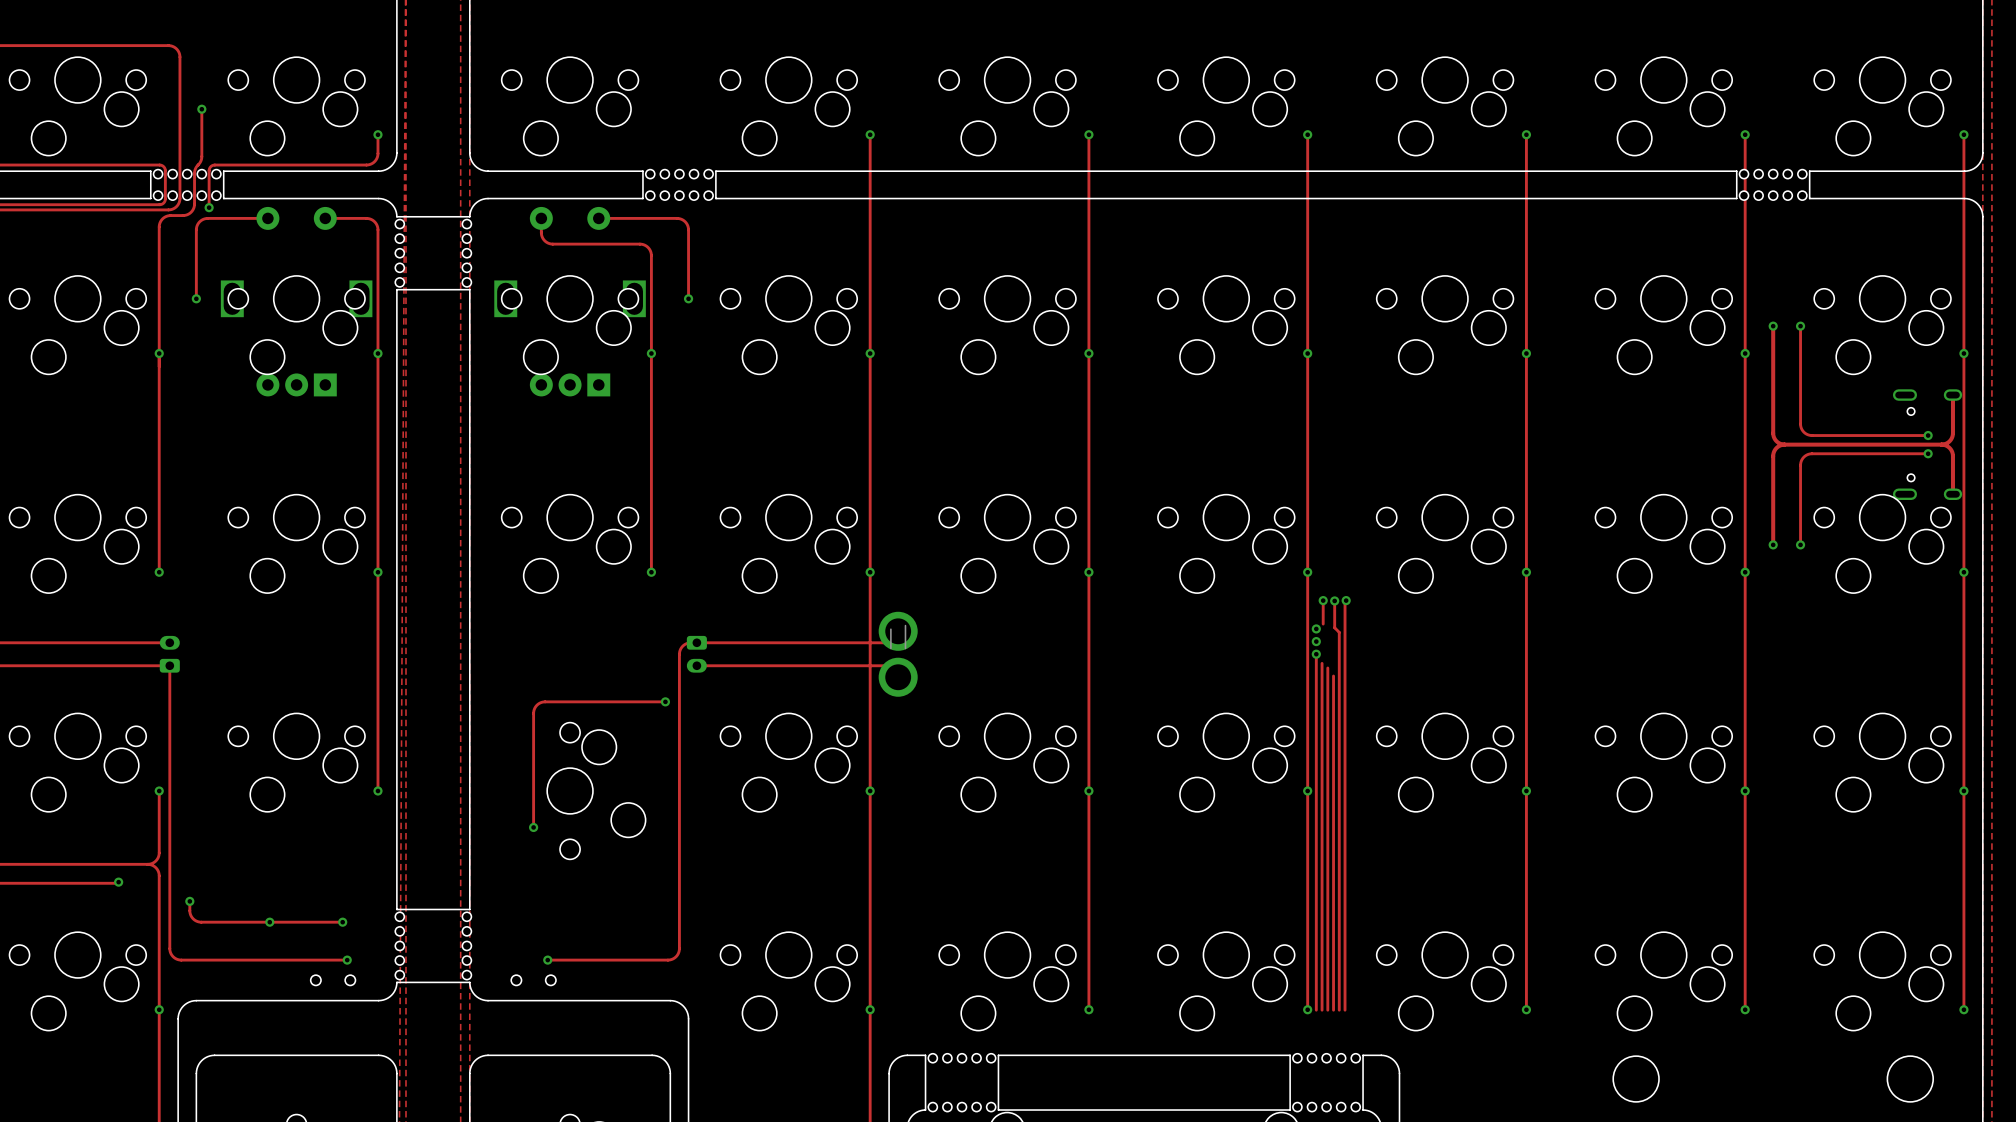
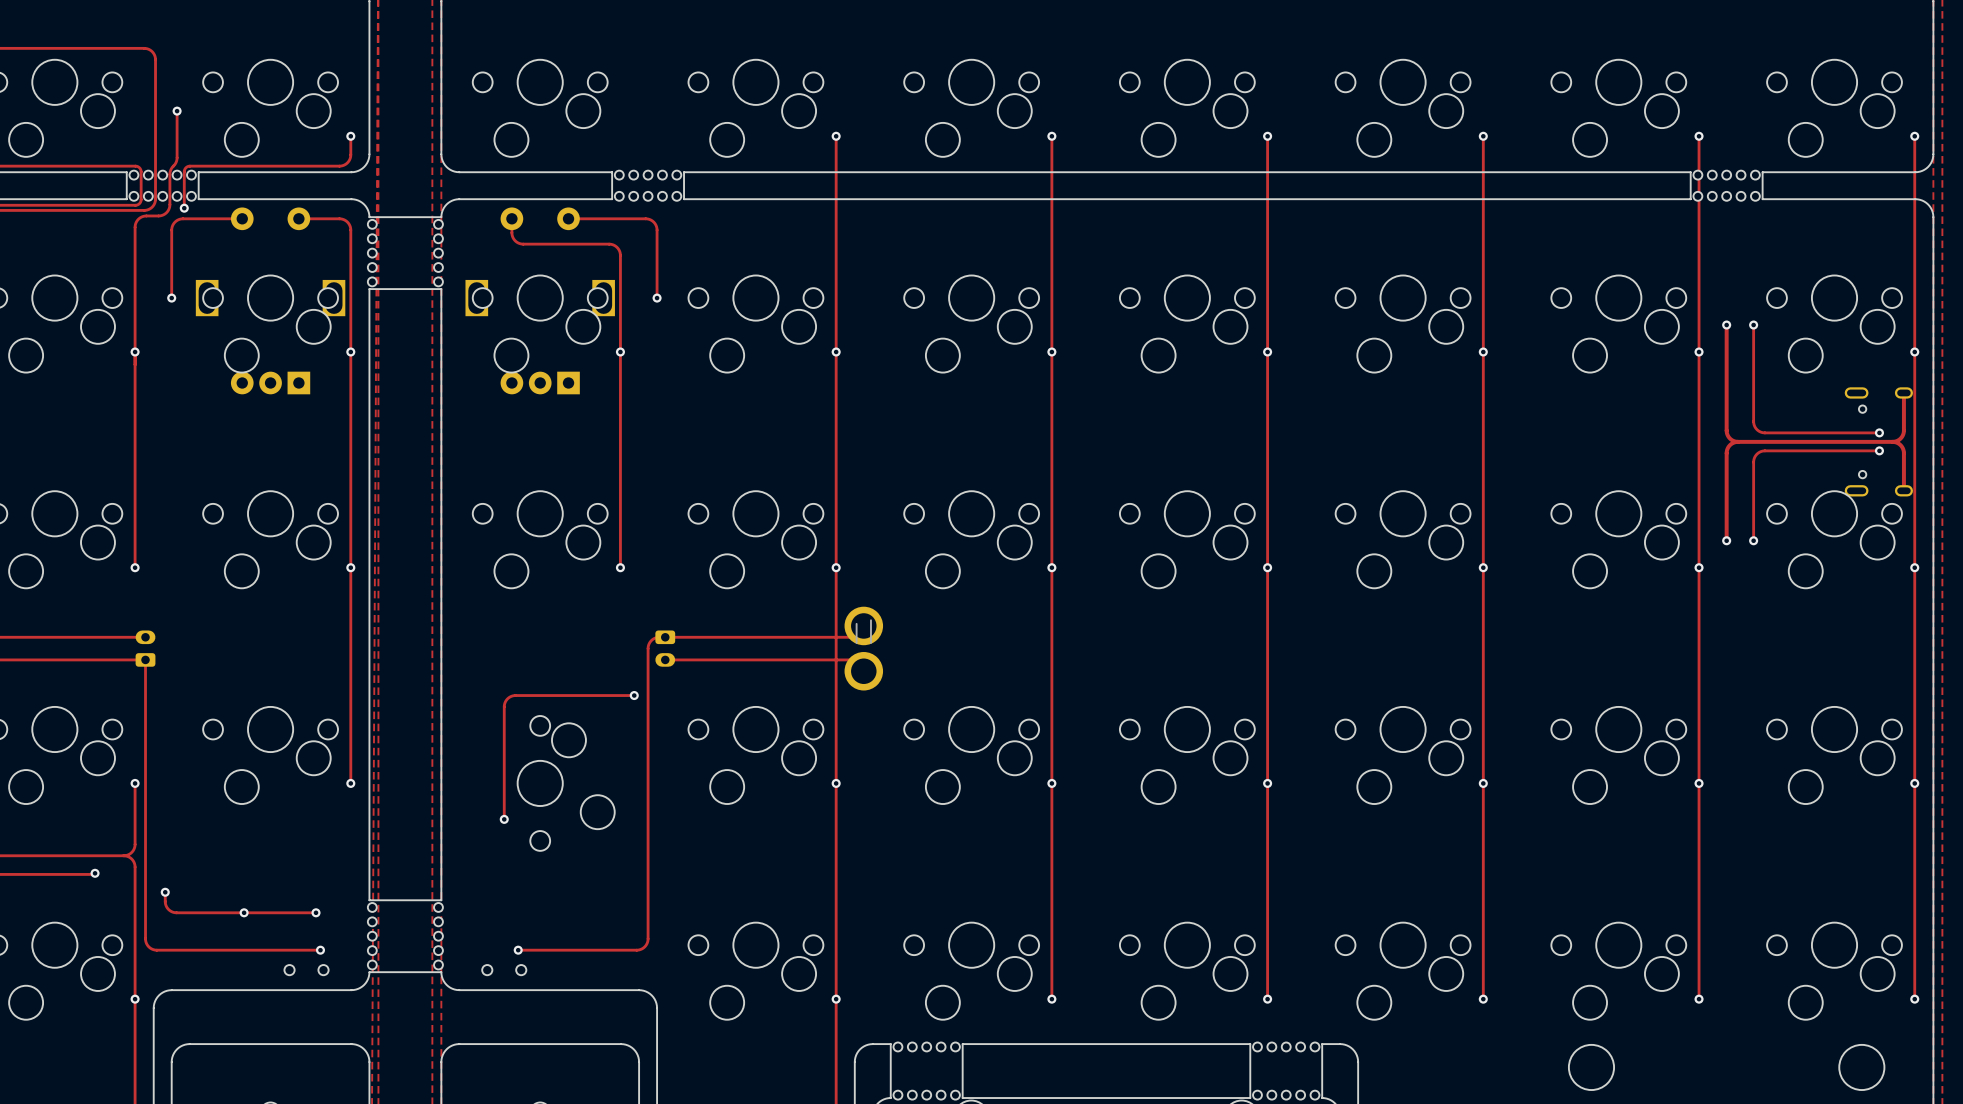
track: (1323, 600) (1323, 624) -> none
via: (1323, 600) -> none
track: (1334, 600) (1334, 627) (1339, 632) (1339, 1010) -> none
via: (1334, 600) -> none
track: (1346, 600) (1345, 1010) -> none
via: (1346, 600) -> none
via: (1316, 628) -> none
via: (1316, 641) -> none
track: (1316, 654) (1316, 1010) -> none
via: (1316, 654) -> none
track: (1322, 663) (1322, 1010) -> none
track: (1327, 667) (1327, 1010) -> none
track: (1333, 676) (1333, 1010) -> none

